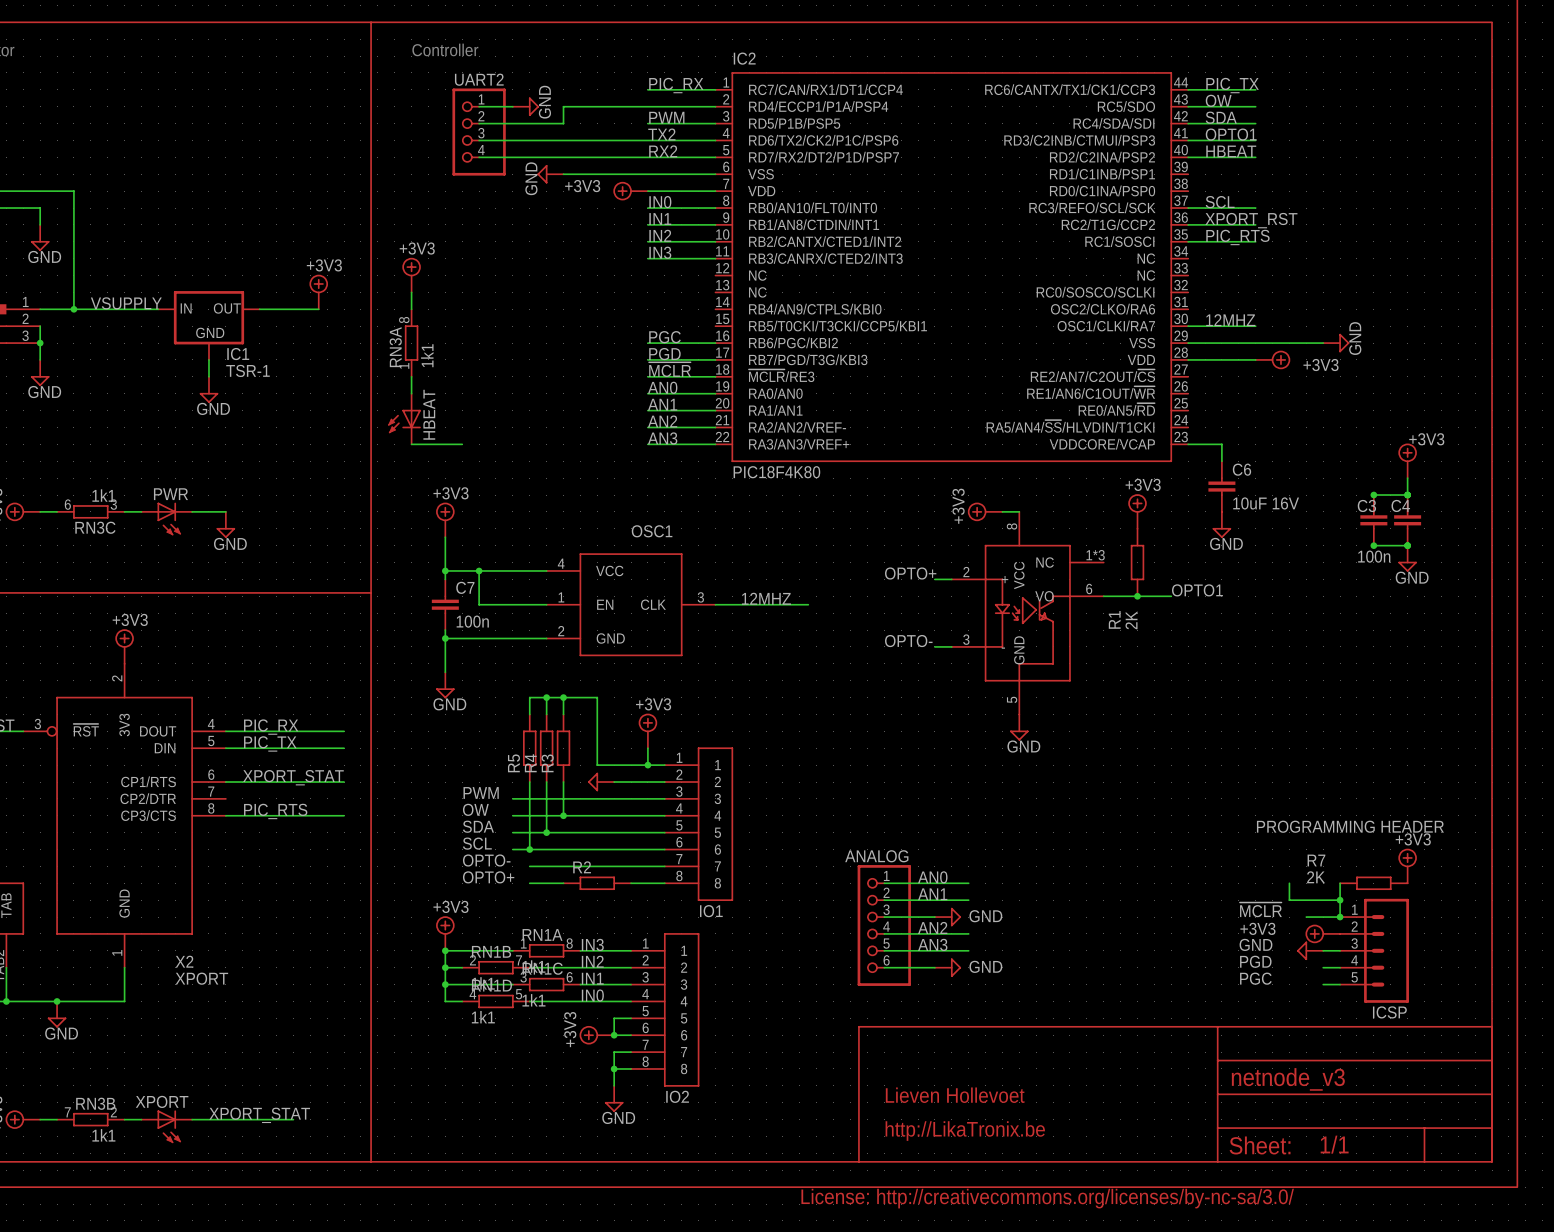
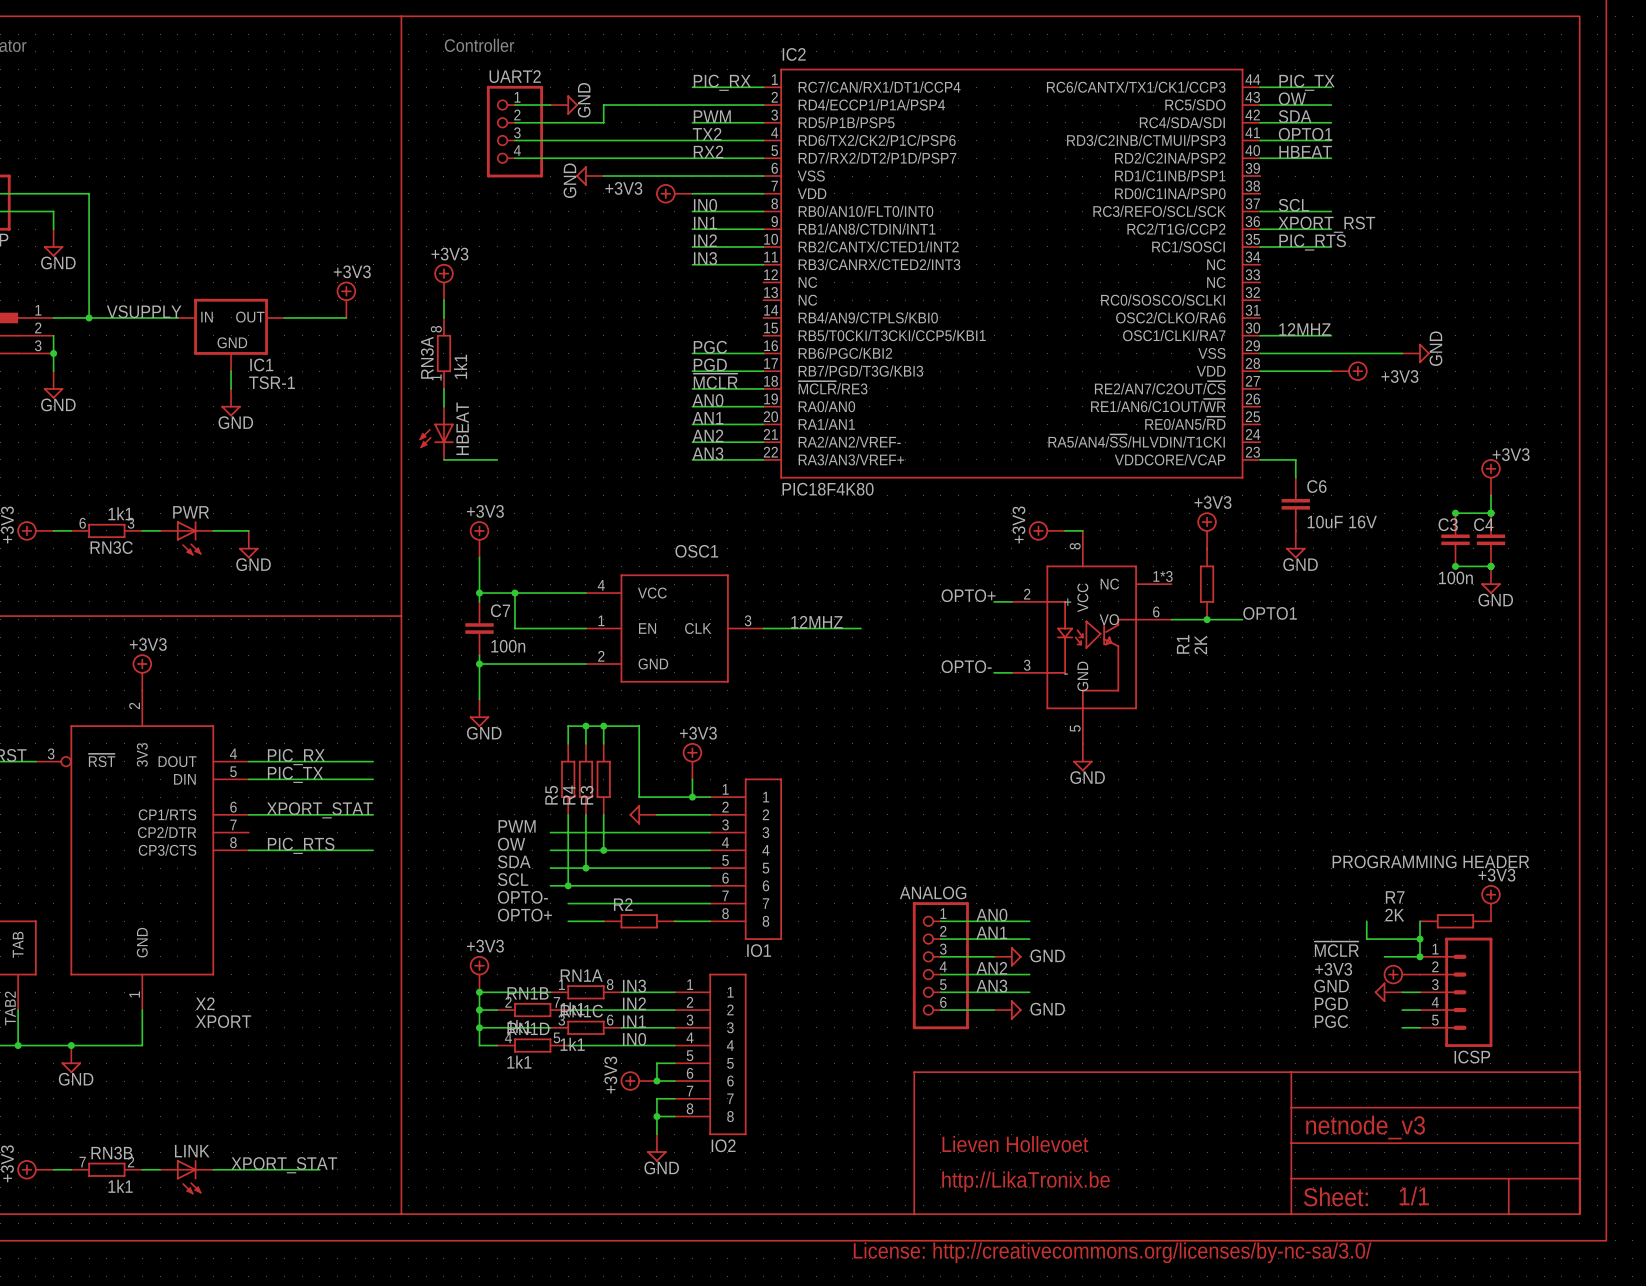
XPORT name: XPORT (162, 1101) -> LINK (192, 1151)

